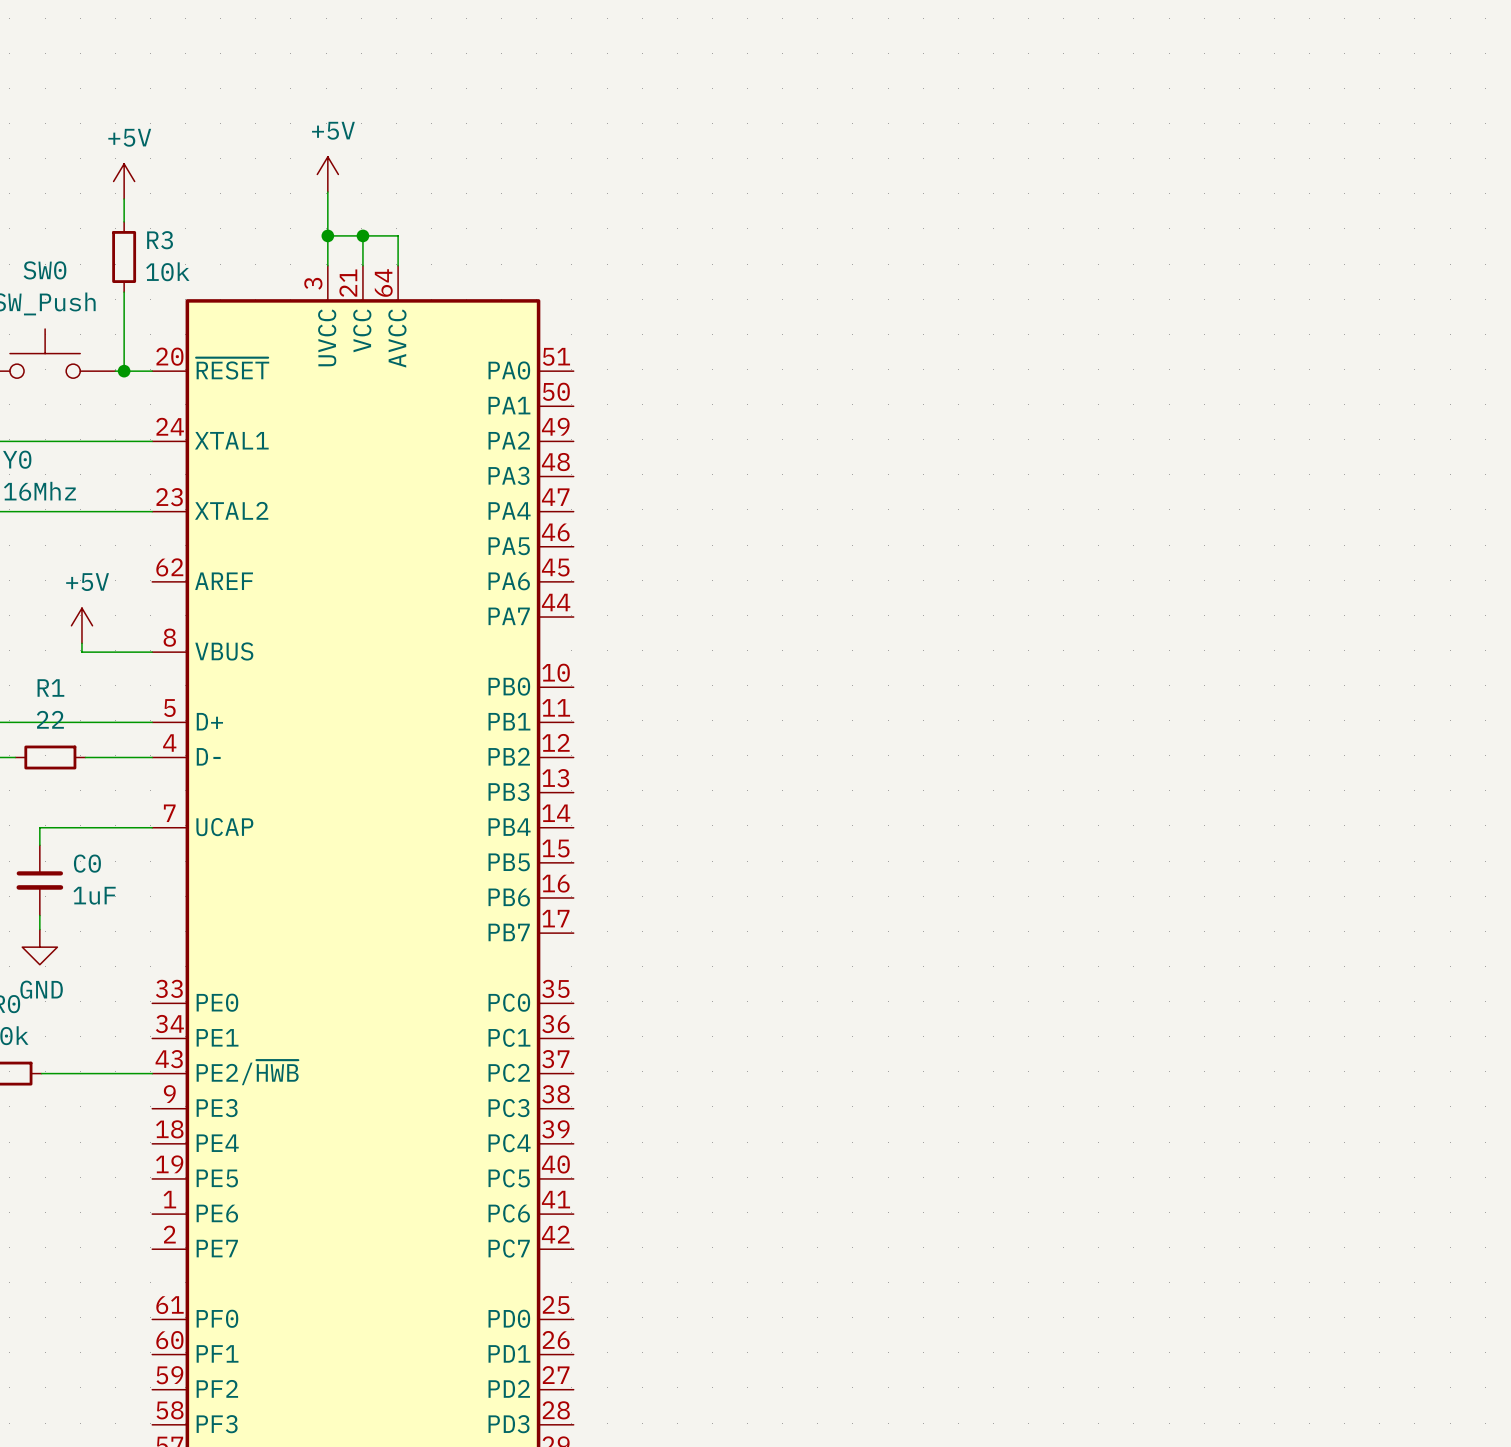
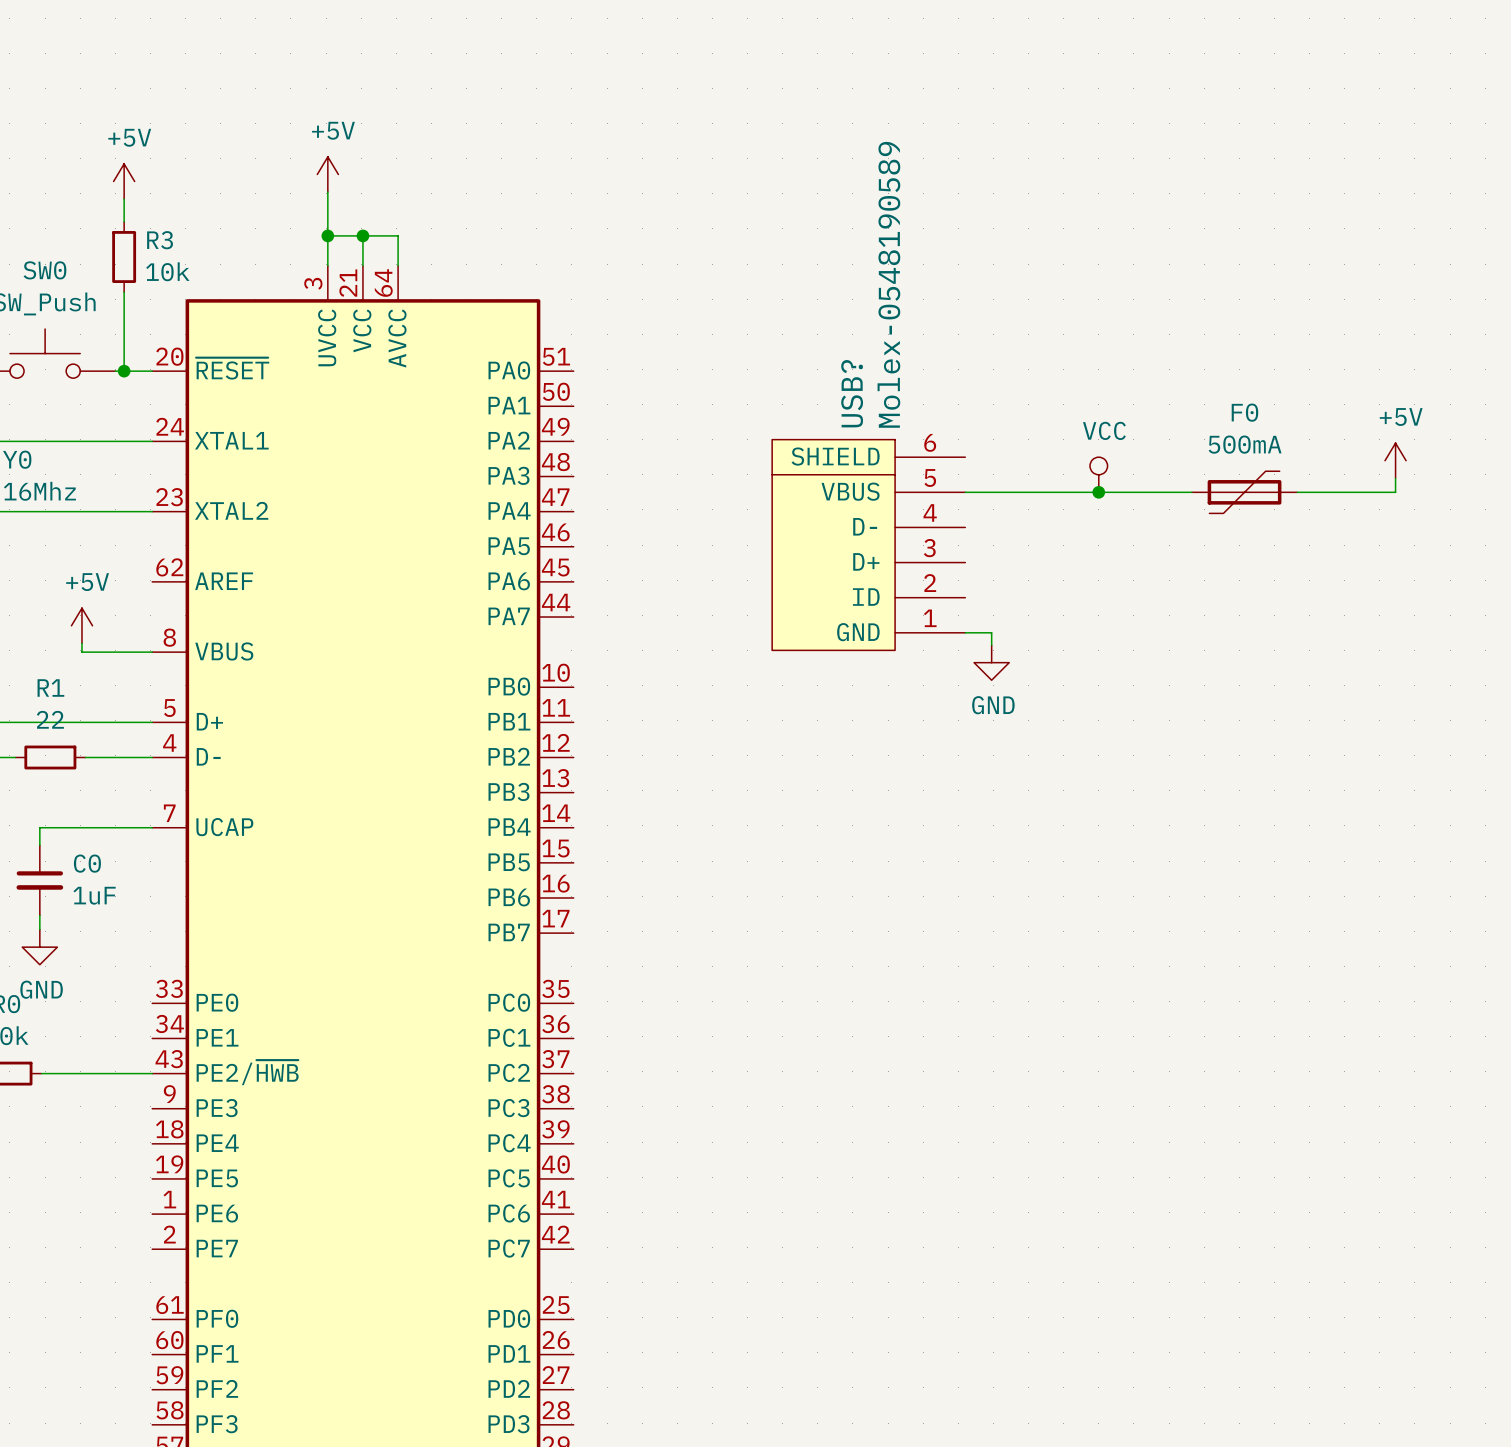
power symbol: none -> +5V (1395, 460)
power symbol: none -> VCC (1098, 474)
wire: none -> (1395, 478) (1395, 492) (1297, 492)
wire: none -> (965, 492) (1191, 492)
junction: none -> (1098, 492)
F0: none -> 500mA (1244, 492)
USB?: none -> Molex-0548190589 (868, 545)
wire: none -> (965, 632) (991, 632) (991, 645)
power symbol: none -> GND (991, 662)

